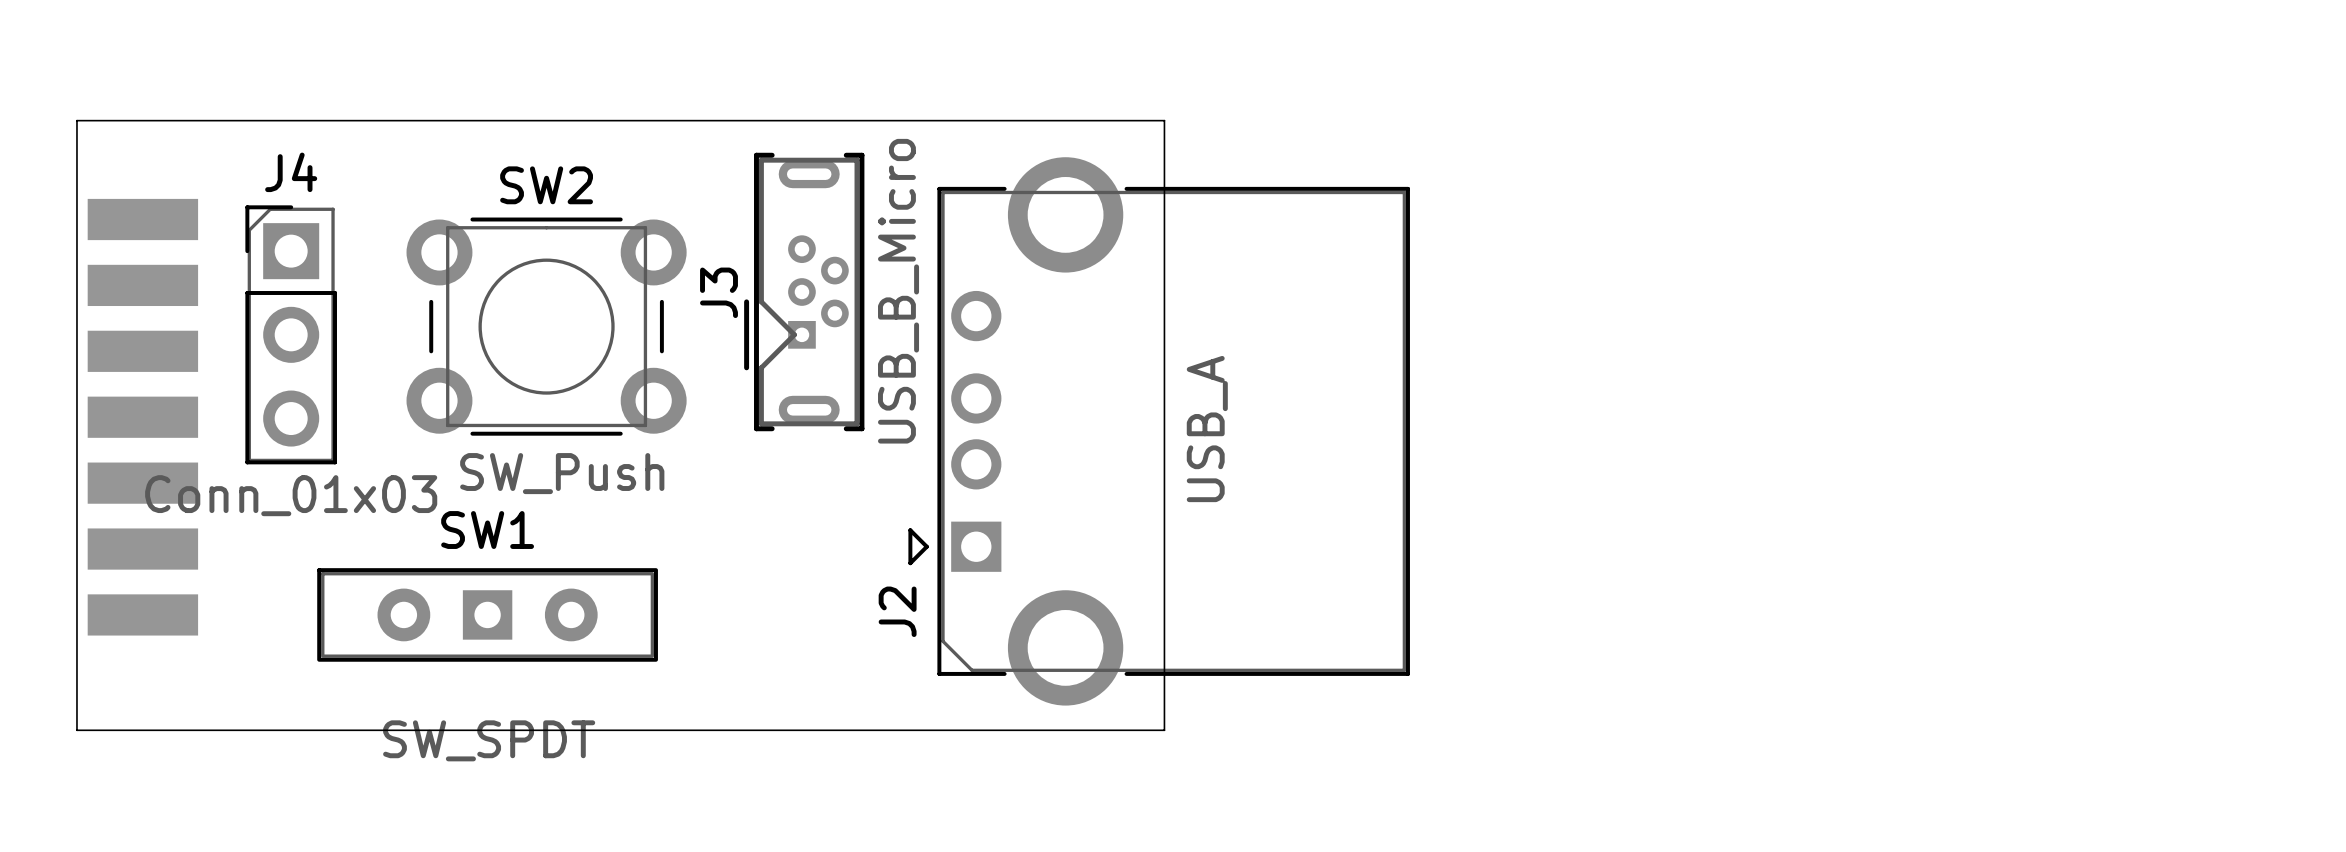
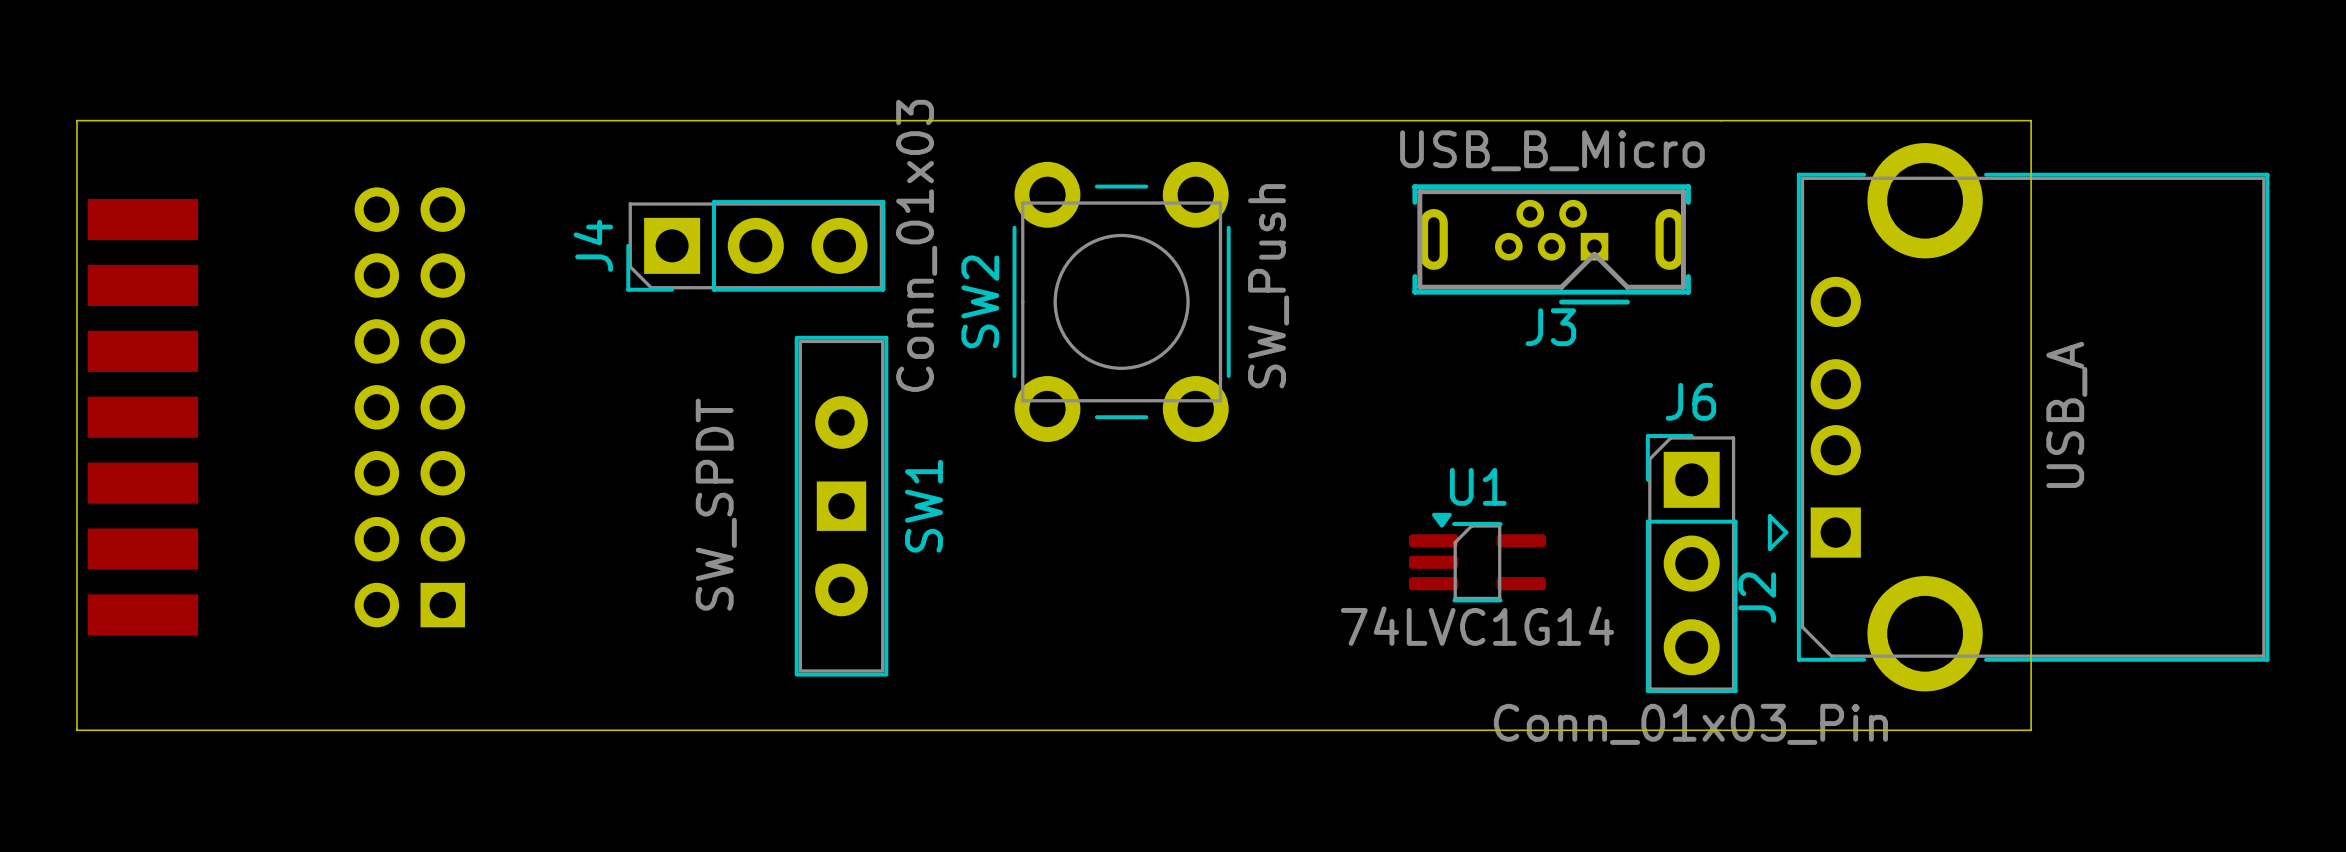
board edge: (1164, 120) (1164, 730) -> (1164, 120) (2031, 120) (2031, 730) (1164, 730)
J3 rotation: 0° (804, 292) -> 90° counterclockwise (1551, 244)
J3 position: (804, 292) -> (1551, 244)
SW2 rotation: 0° (546, 326) -> 90° counterclockwise (1121, 301)
SW2 position: (546, 326) -> (1121, 301)
J4 rotation: 0° (291, 334) -> 90° counterclockwise (755, 245)
J4 position: (291, 334) -> (755, 245)
part: none -> (409, 407)
J2 position: (1159, 431) -> (2018, 417)
U1: none -> 74LVC1G14 (1477, 557)
J6: none -> Conn_01x03_Pin (1691, 563)
SW1 rotation: 0° (487, 614) -> 90° clockwise (841, 506)
SW1 position: (487, 614) -> (841, 506)

